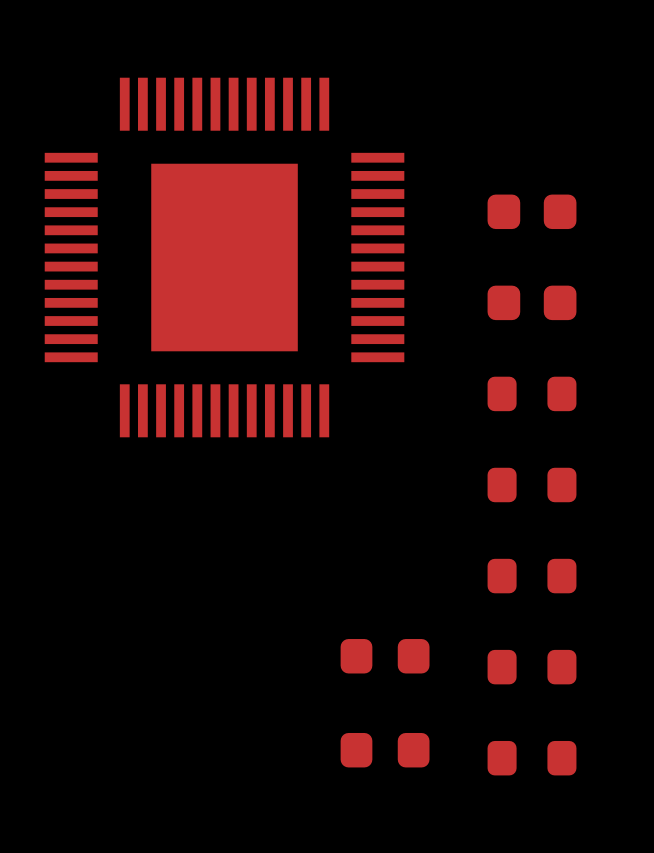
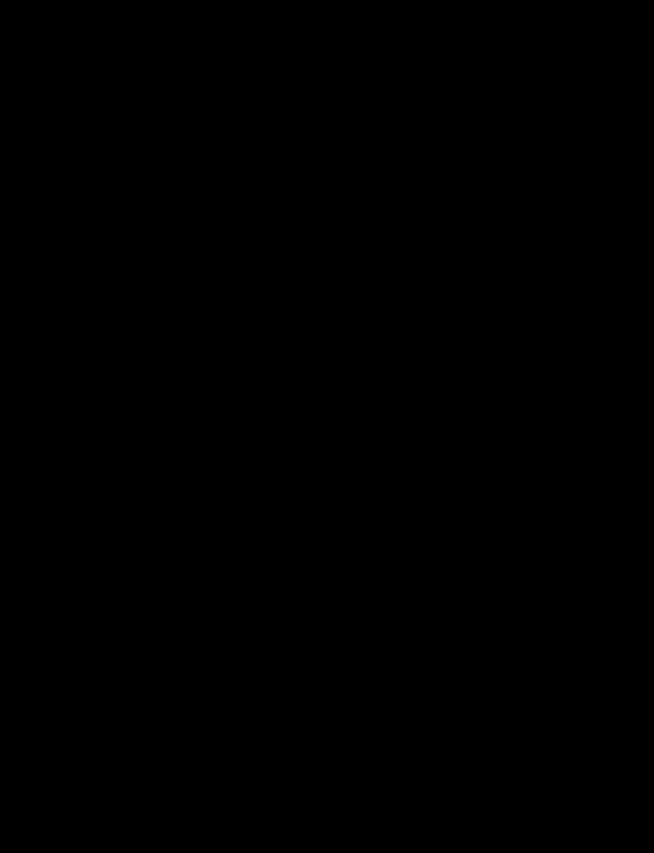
part: (532, 211) -> none
part: (224, 257) -> none
part: (532, 302) -> none
part: (532, 393) -> none
part: (532, 485) -> none
part: (532, 576) -> none
part: (385, 656) -> none
part: (532, 667) -> none
part: (385, 750) -> none
part: (532, 758) -> none

